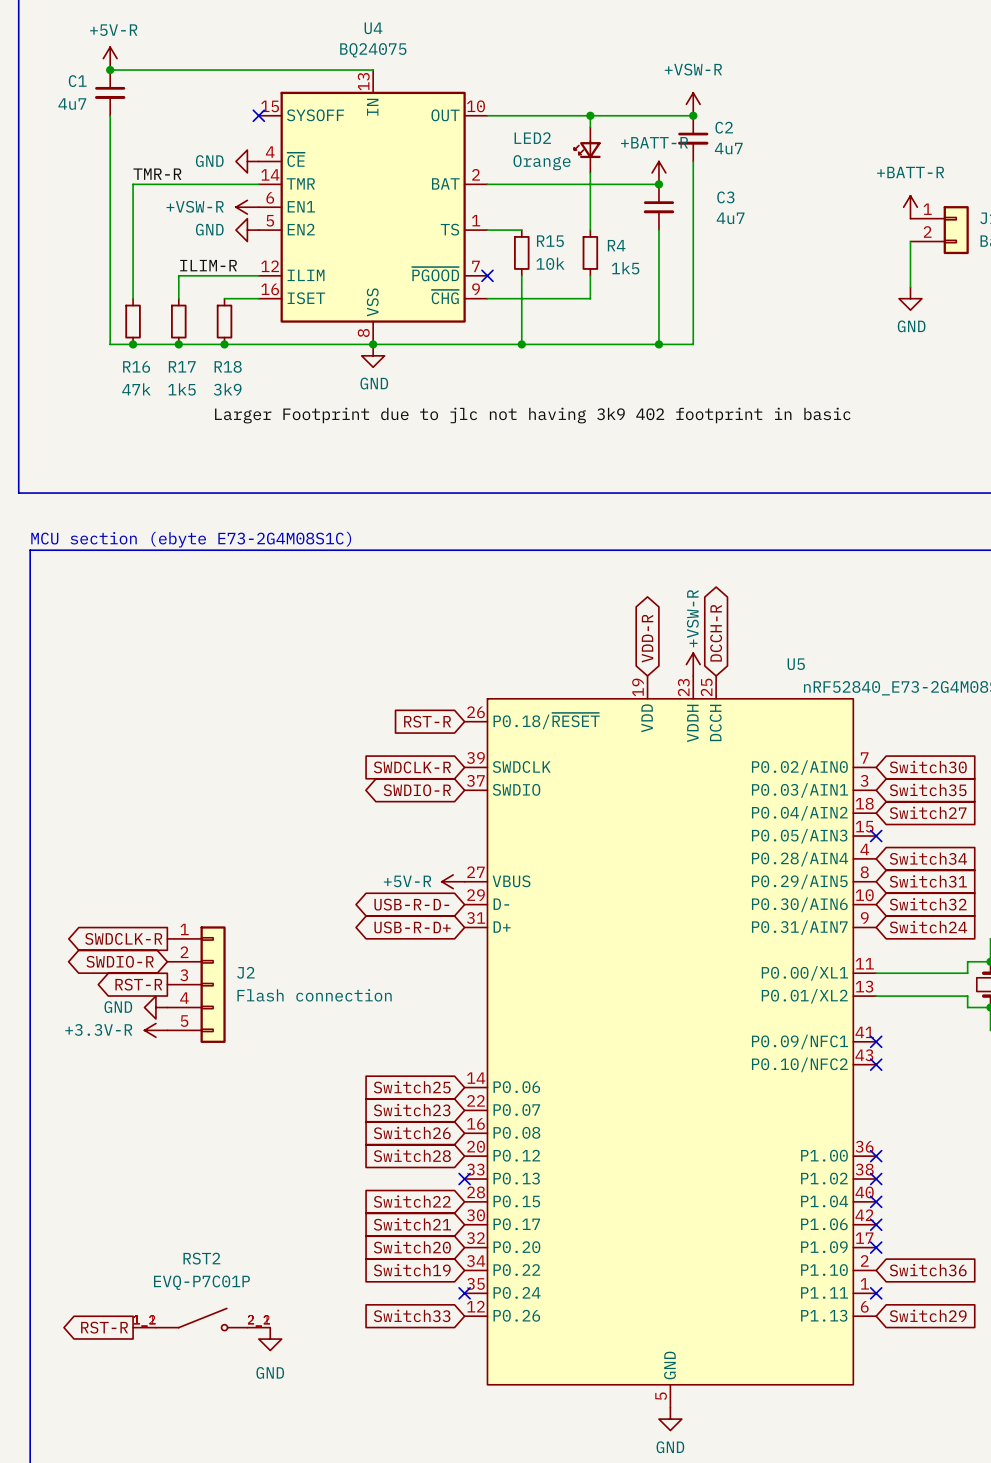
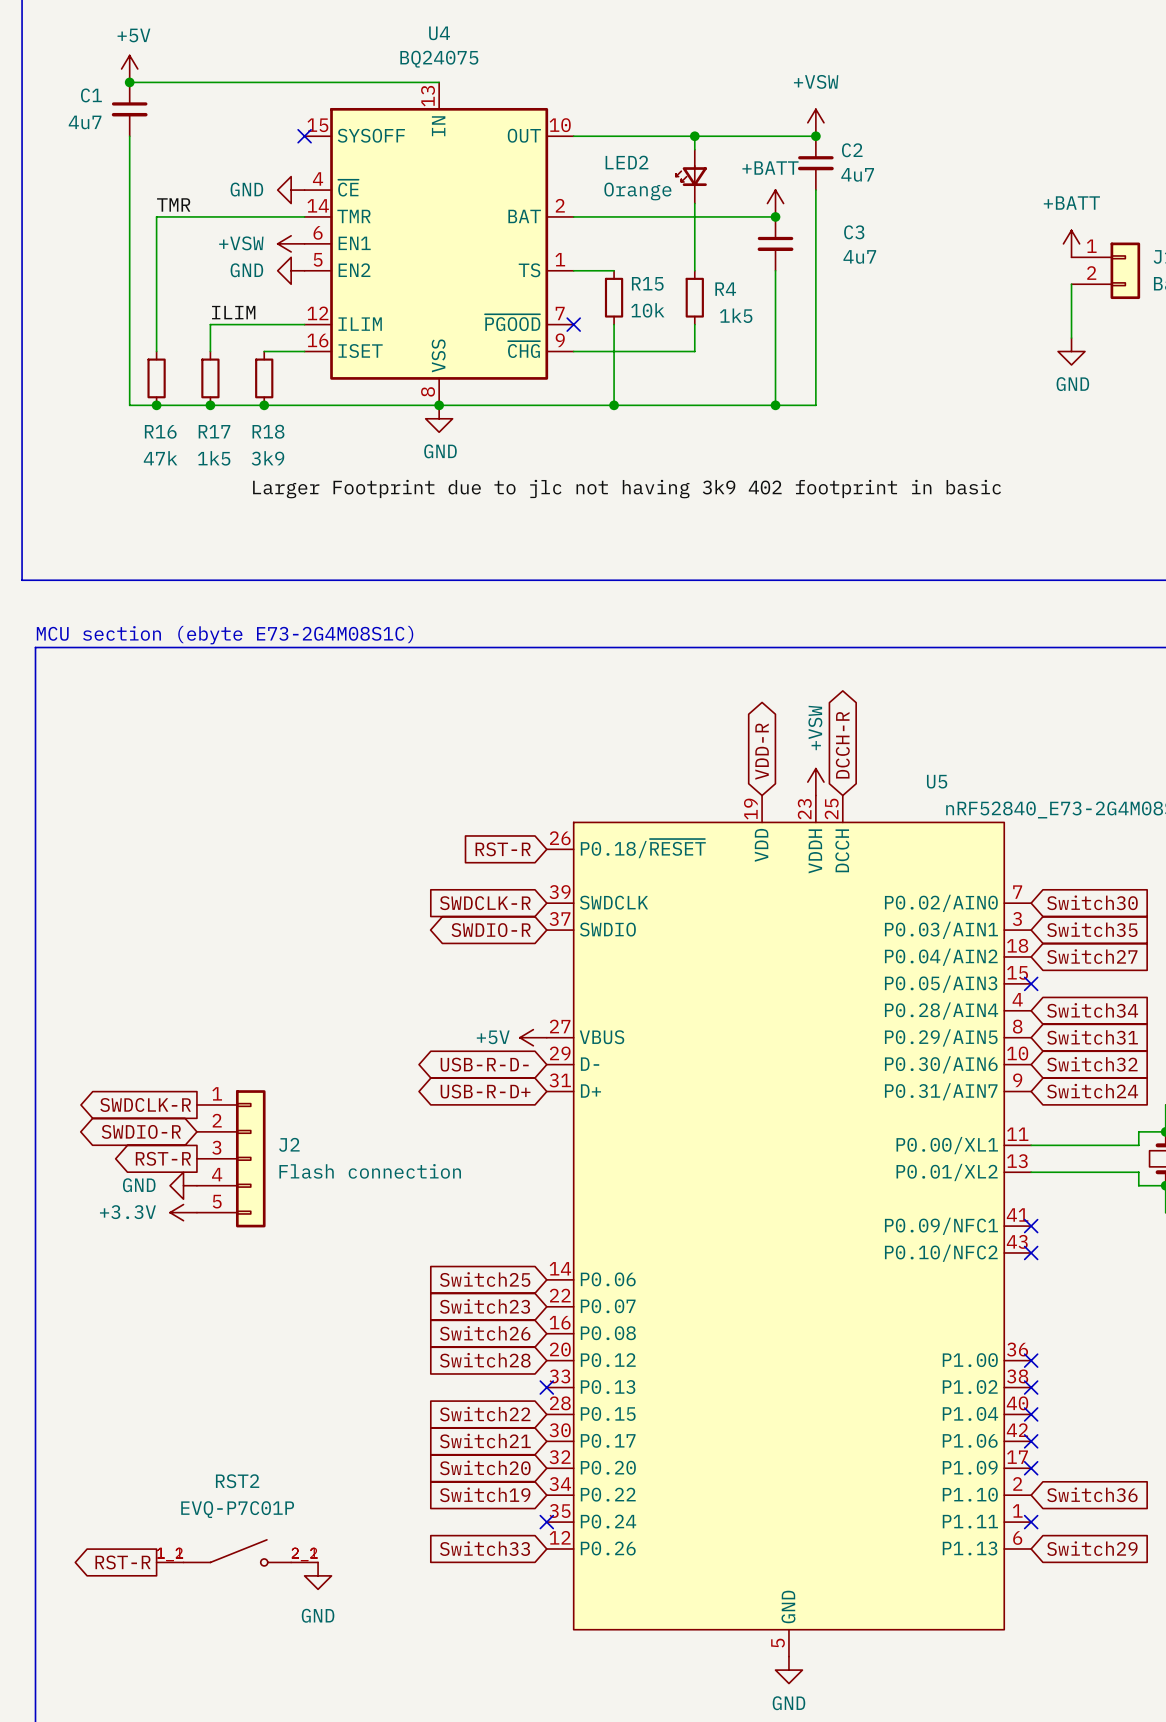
power symbol: +5V-R (110, 58) -> +5V (129, 68)
power symbol: +VSW-R (693, 104) -> +VSW (815, 122)
power symbol: +BATT-R (658, 172) -> +BATT (775, 203)
label: TMR-R (157, 174) -> TMR (173, 204)
power symbol: +VSW-R (247, 207) -> +VSW (291, 243)
power symbol: +BATT-R (910, 207) -> +BATT (1071, 243)
label: ILIM-R (208, 265) -> ILIM (233, 312)
power symbol: +VSW-R (693, 664) -> +VSW (815, 782)
power symbol: +5V-R (453, 881) -> +5V (533, 1037)
power symbol: +3.3V-R (155, 1030) -> +3.3V (183, 1212)

